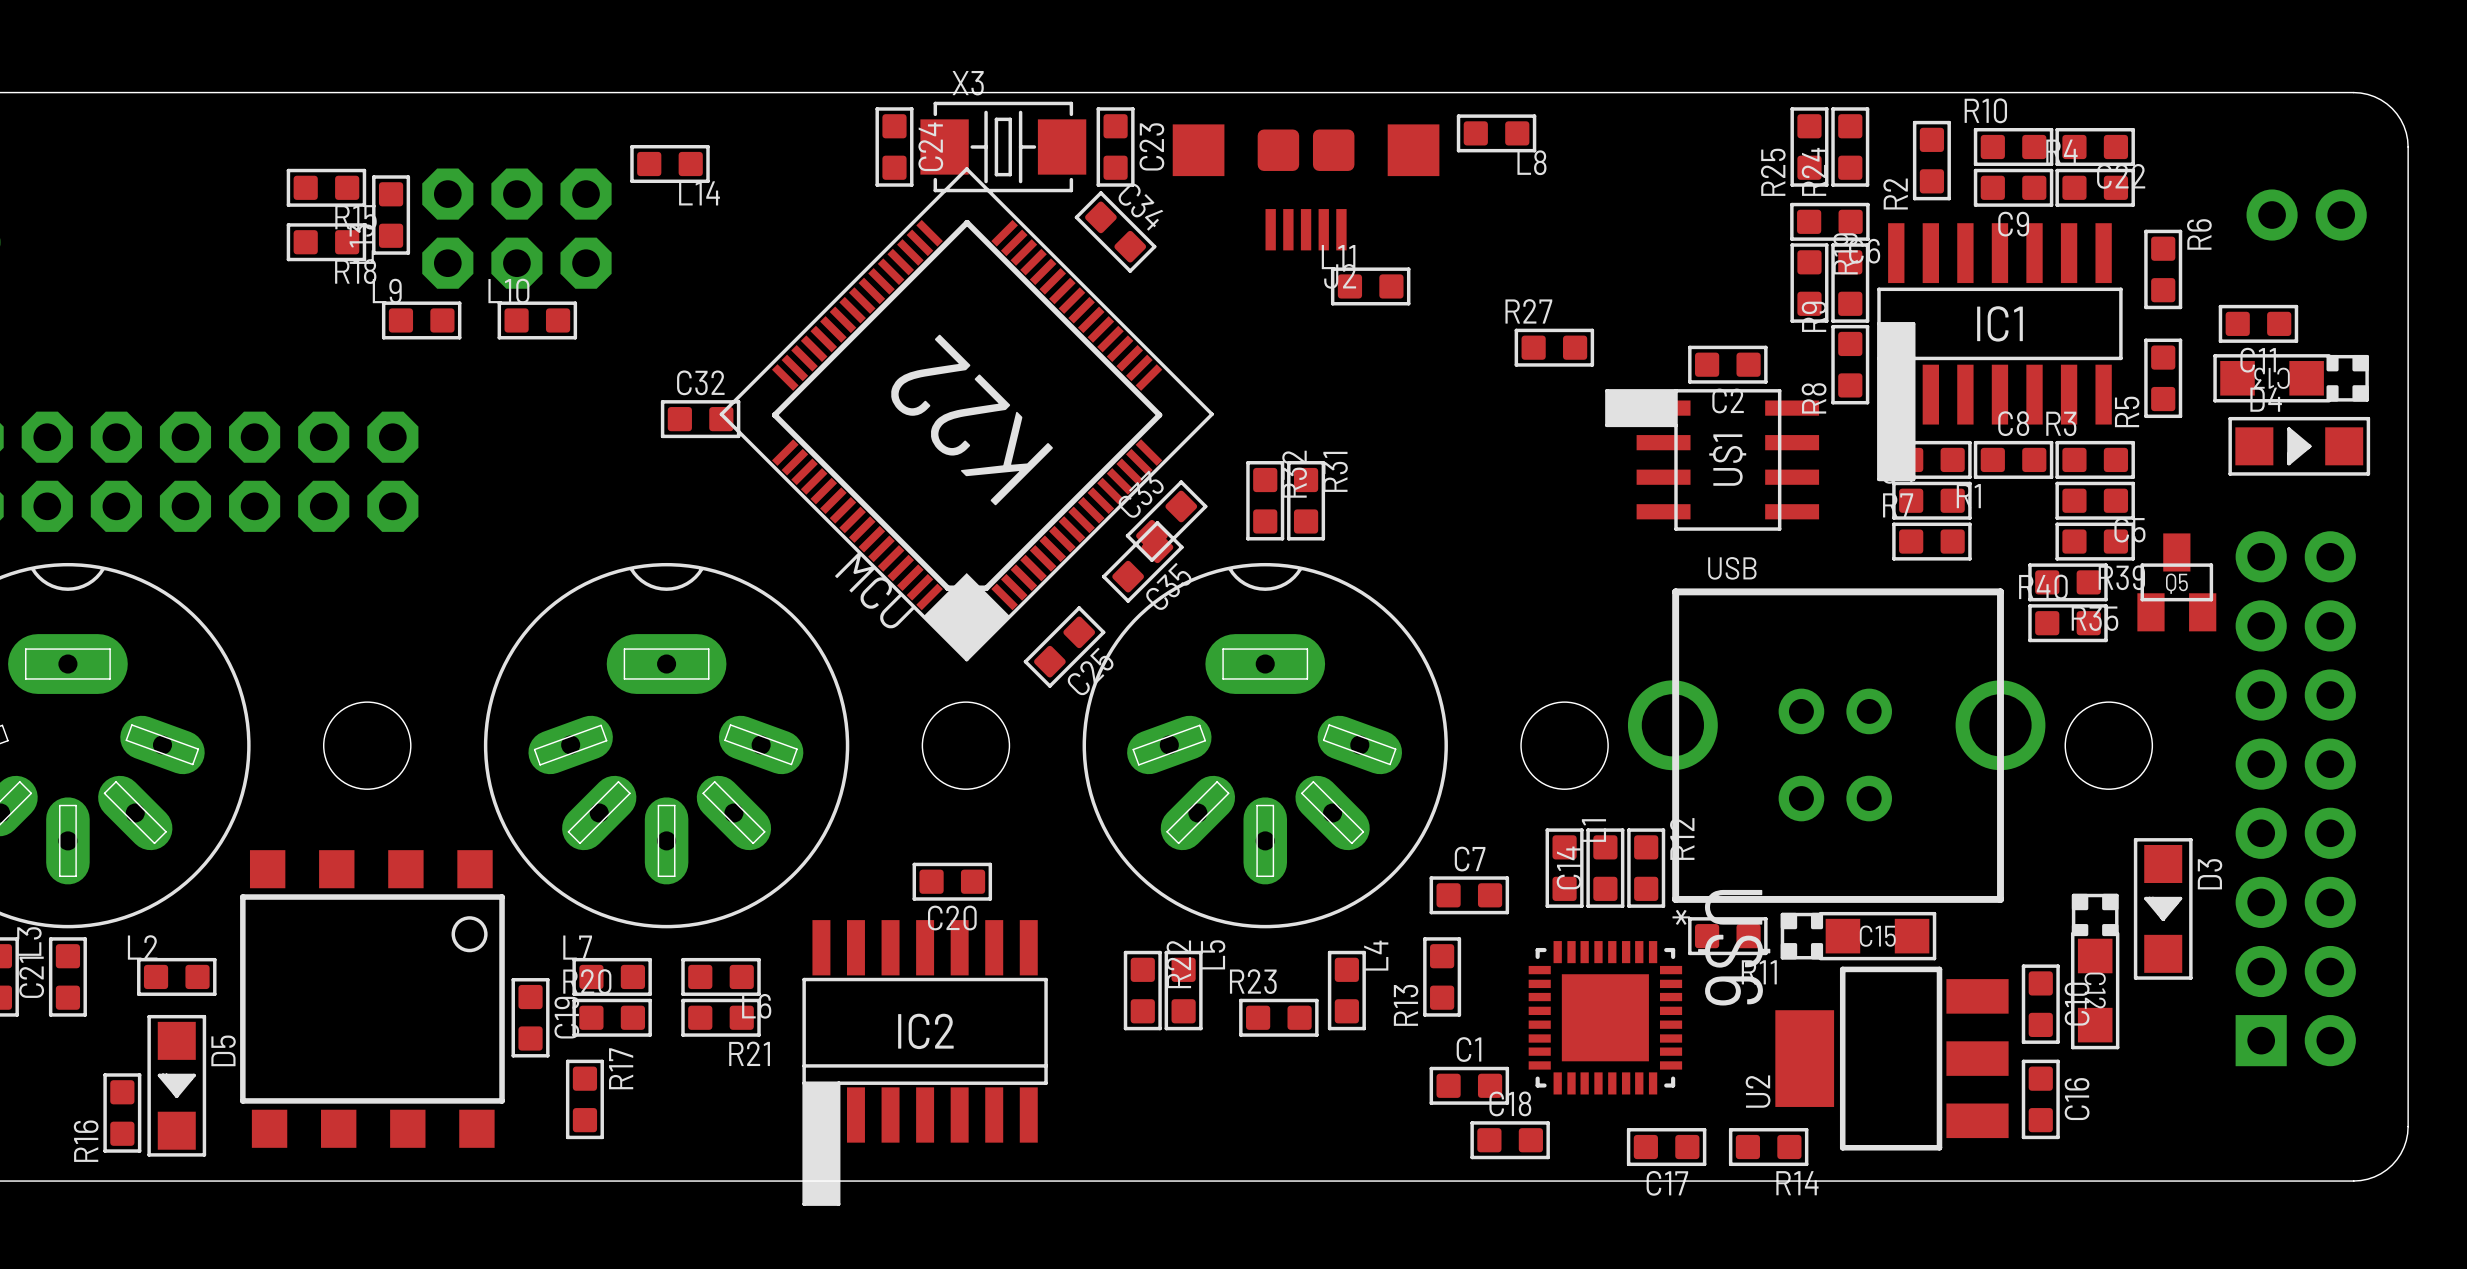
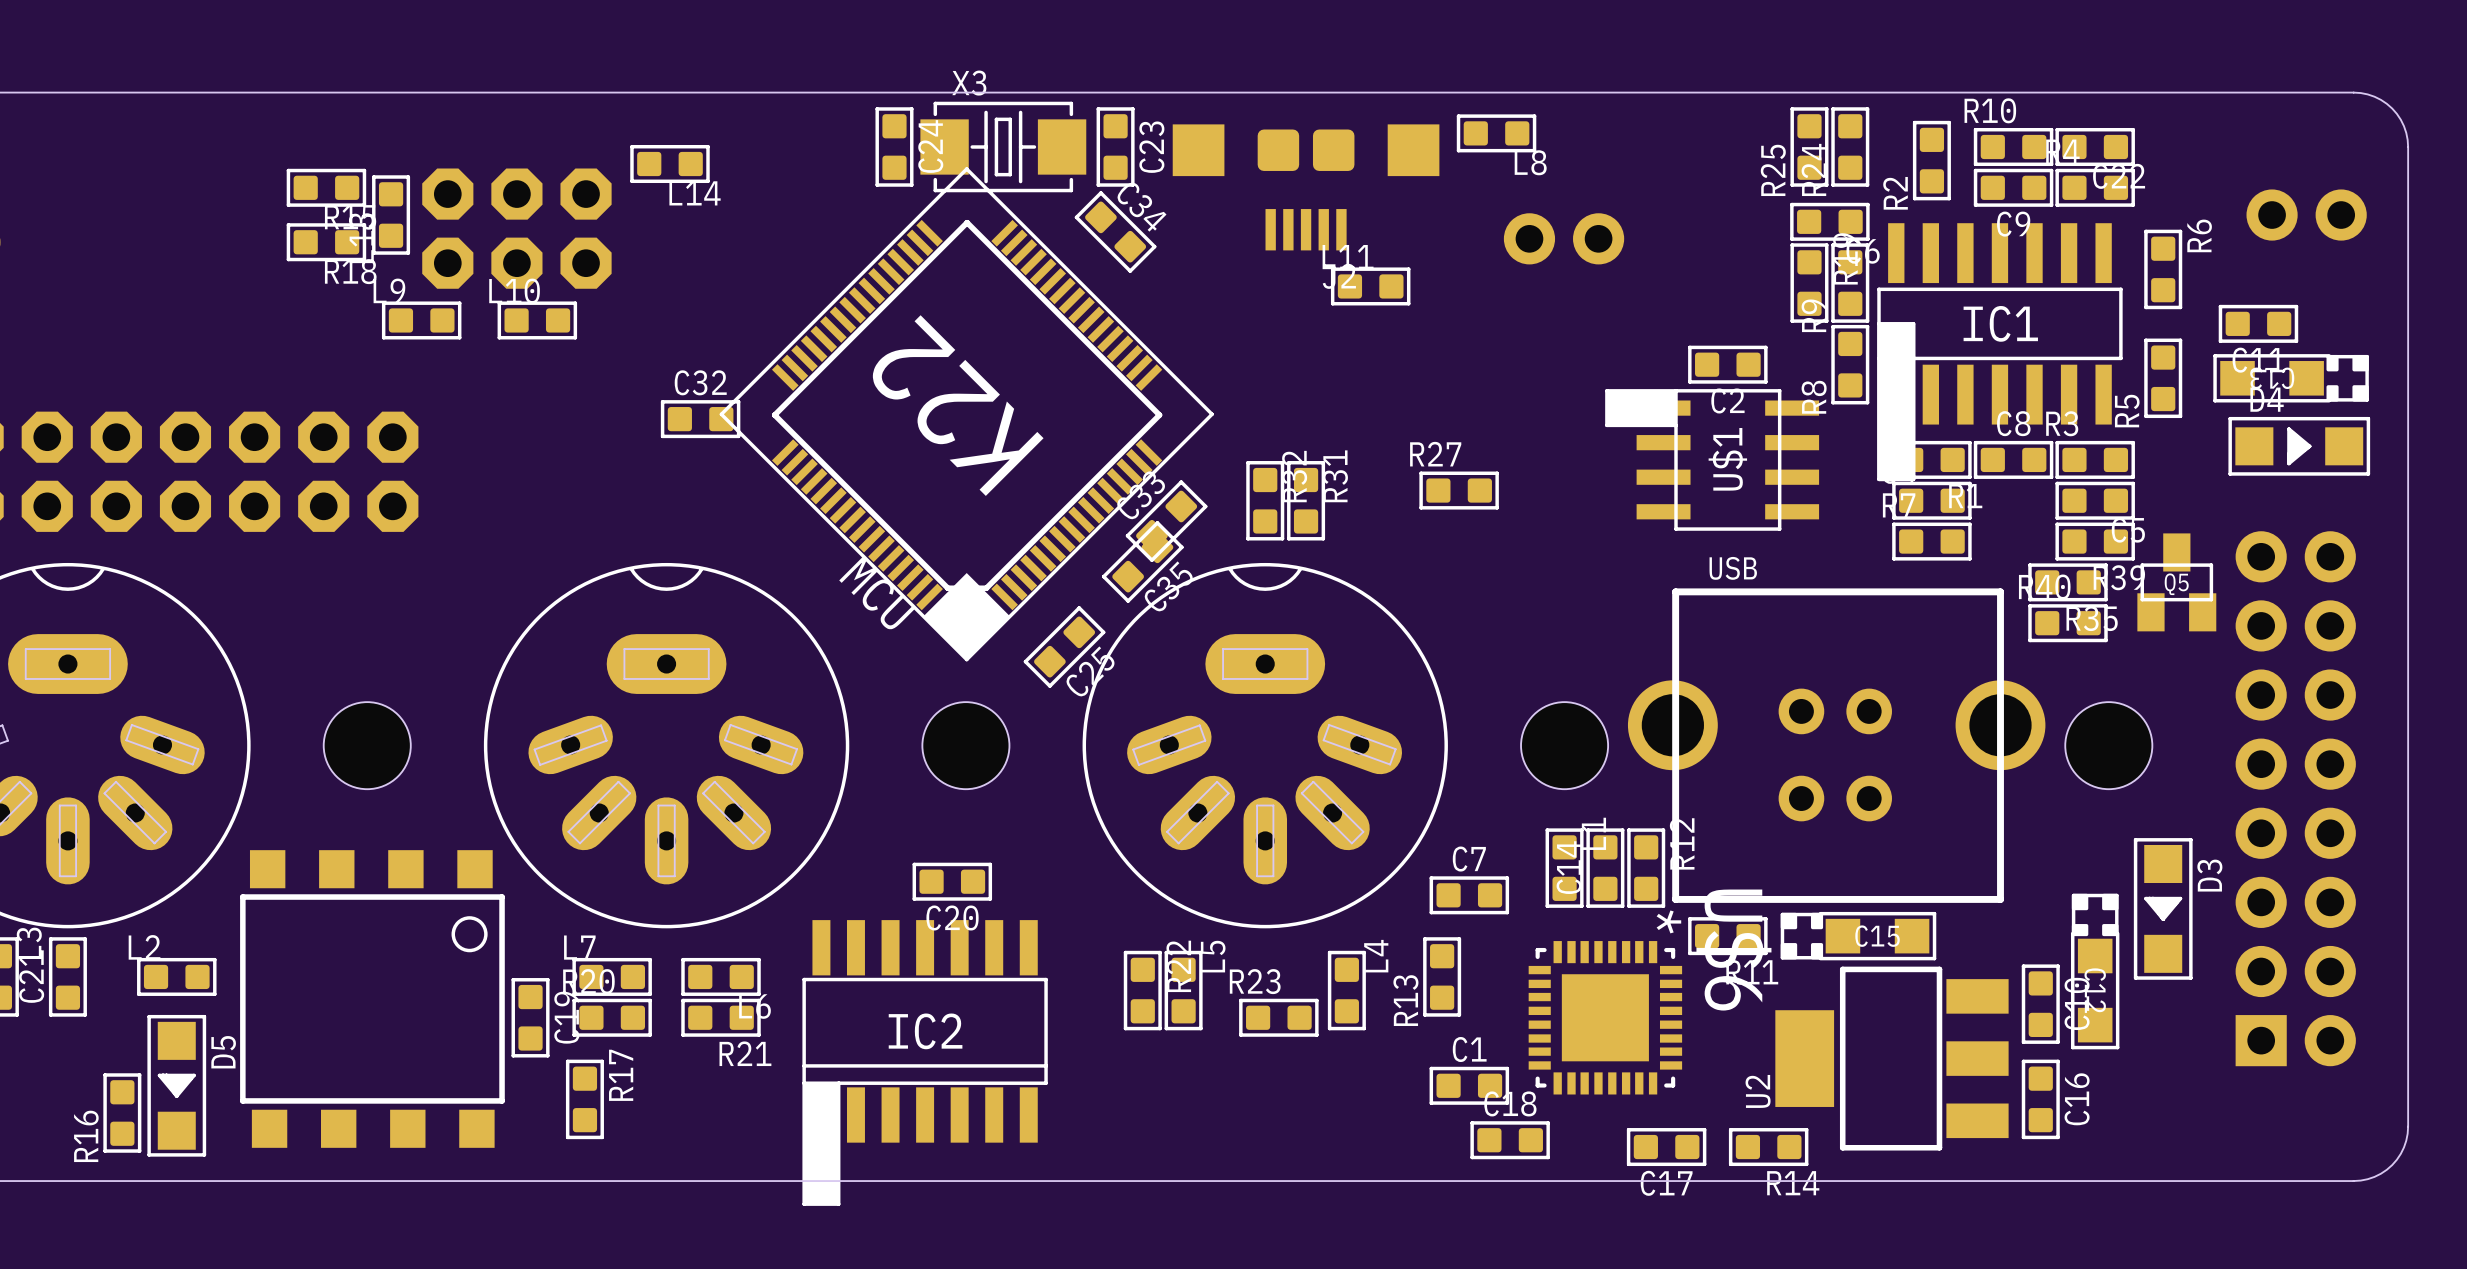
part: none -> (1564, 238)
R27 position: (1554, 347) -> (1459, 490)

